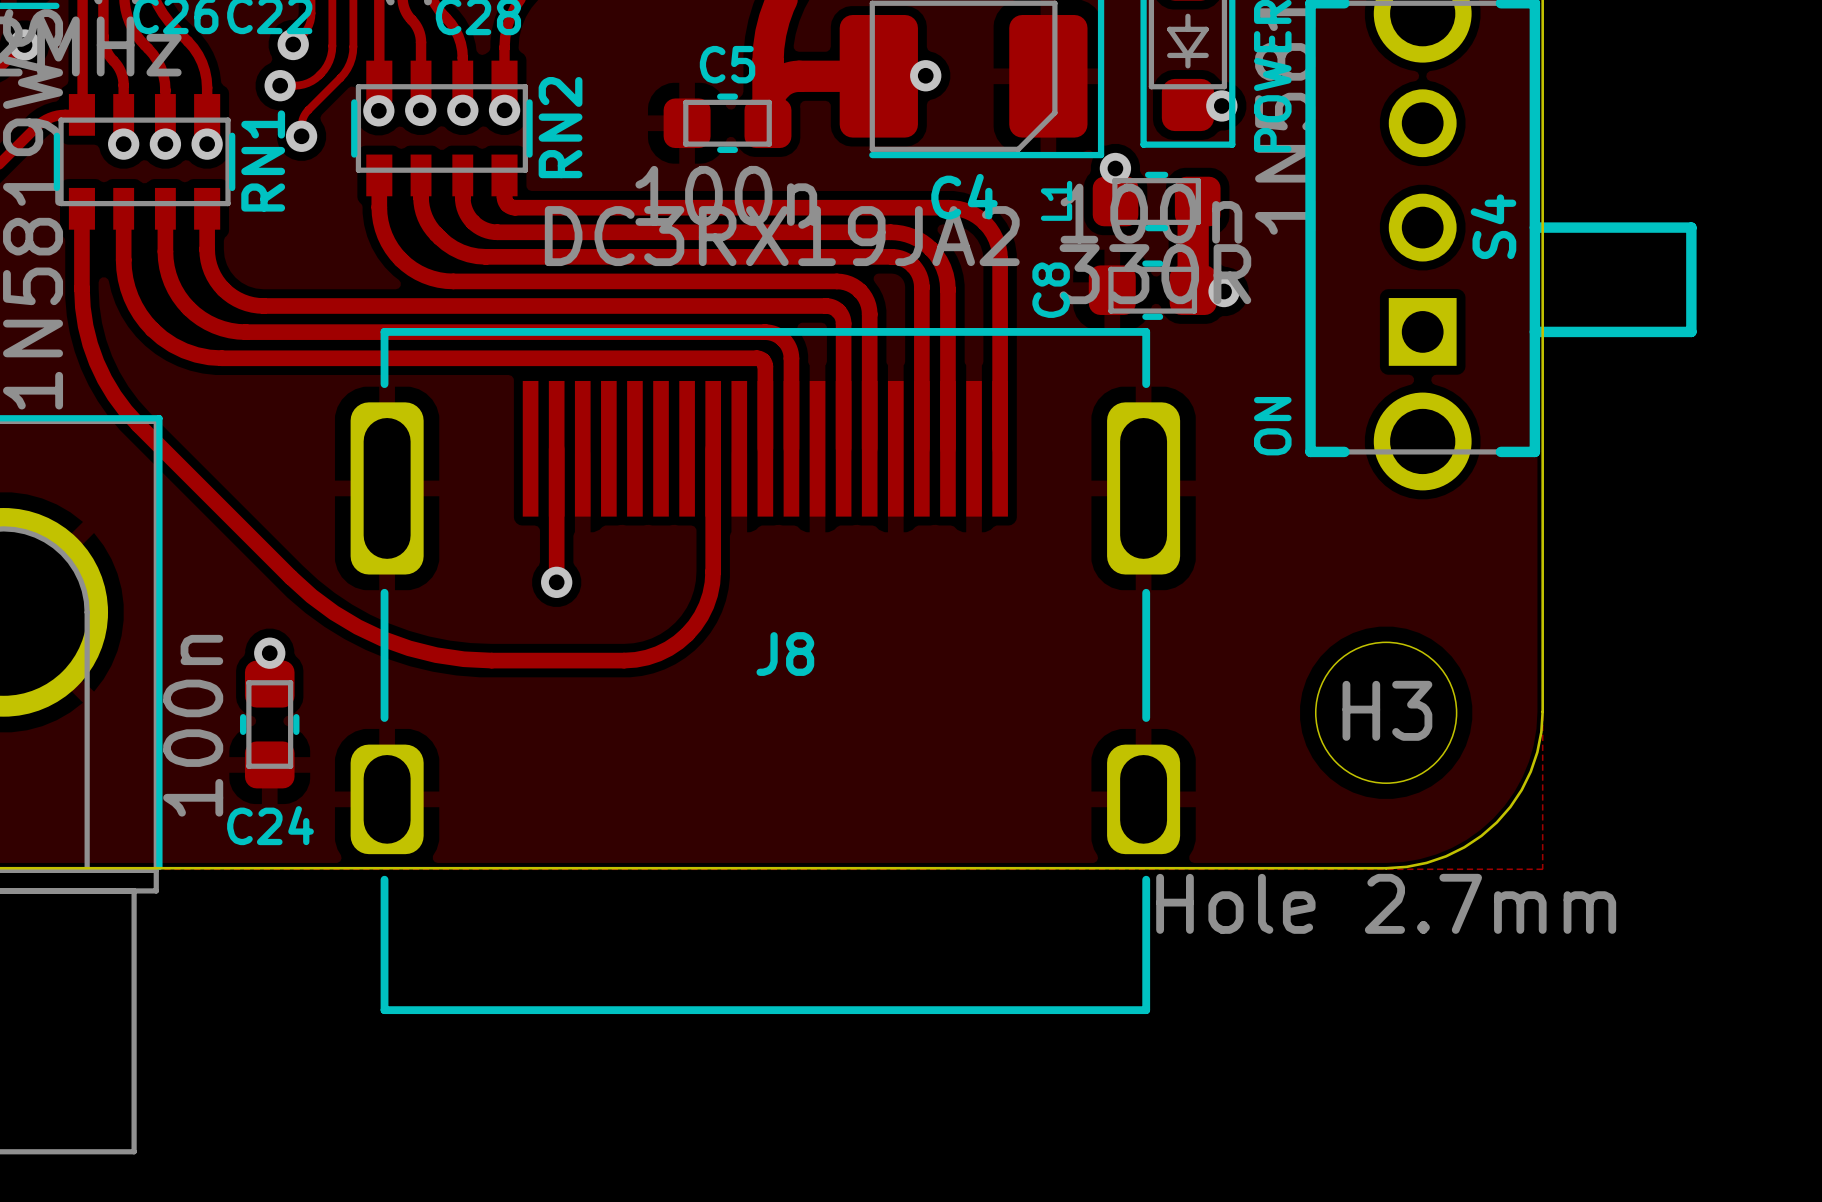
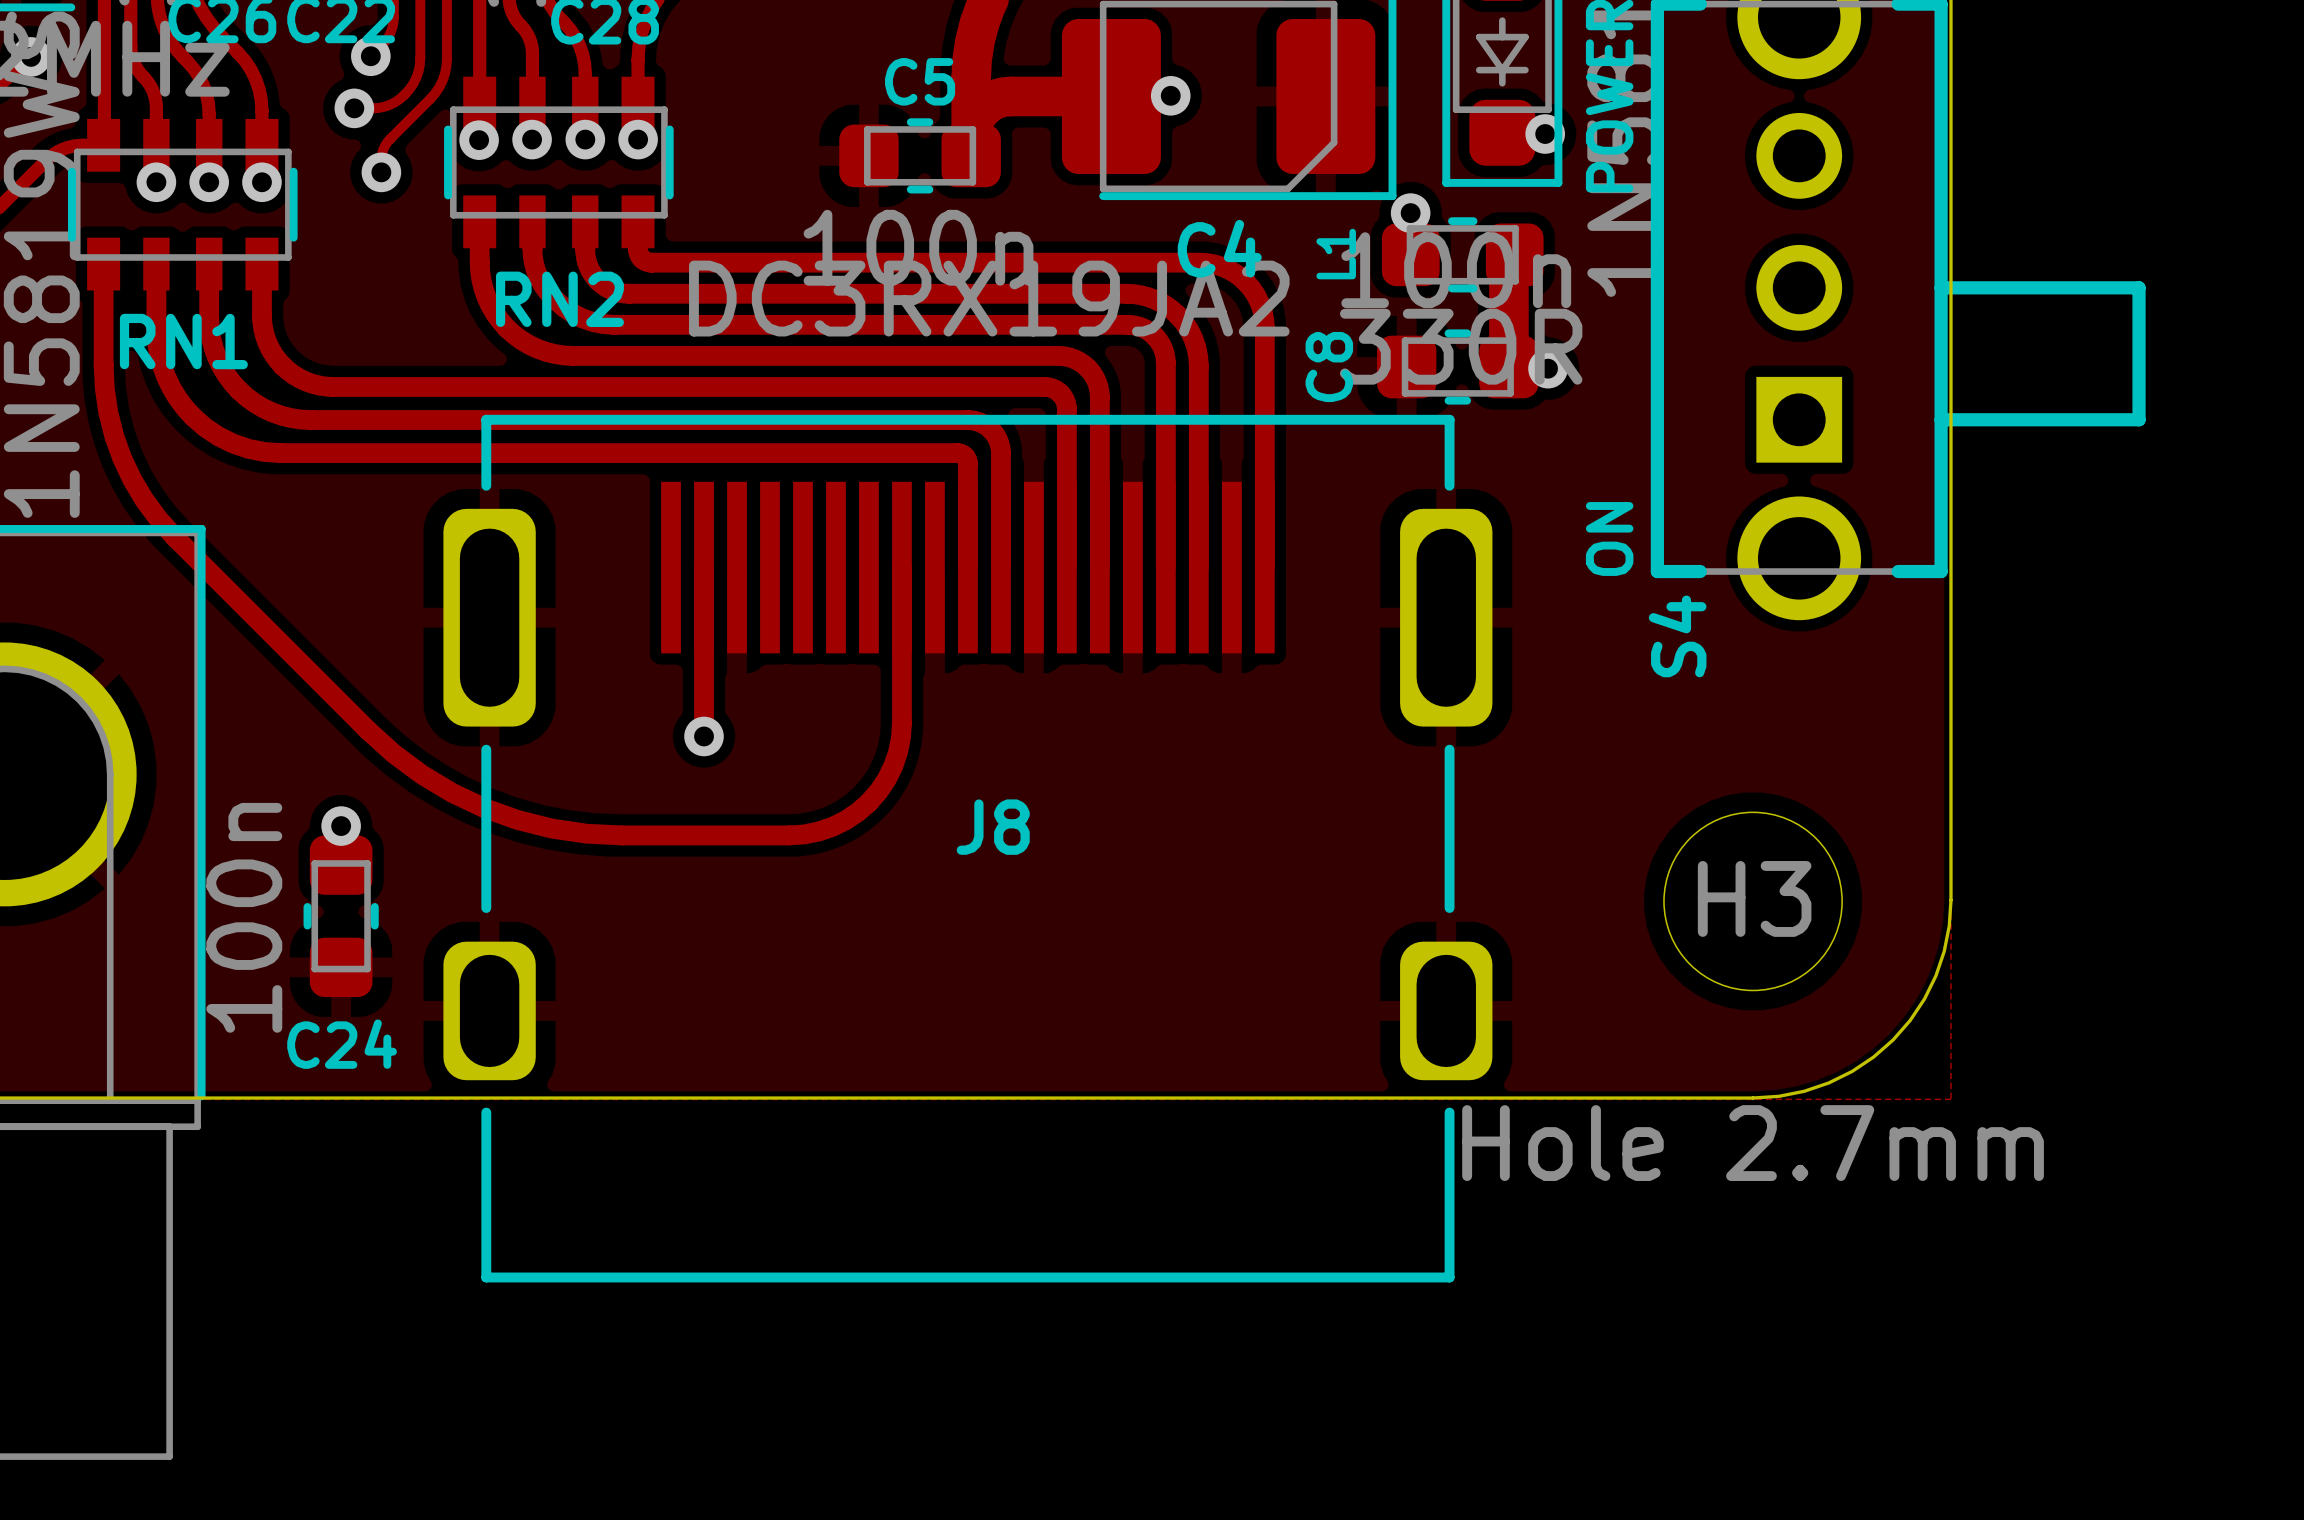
RN2 name rotation: 0° (560, 127) -> 90° clockwise (559, 299)
RN2 name position: RN2 (560, 127) -> RN2 (559, 299)
RN1 name rotation: 0° (263, 160) -> 90° clockwise (183, 341)
RN1 name position: RN1 (263, 160) -> RN1 (183, 341)
S4 name position: S4 (1493, 226) -> S4 (1677, 636)

